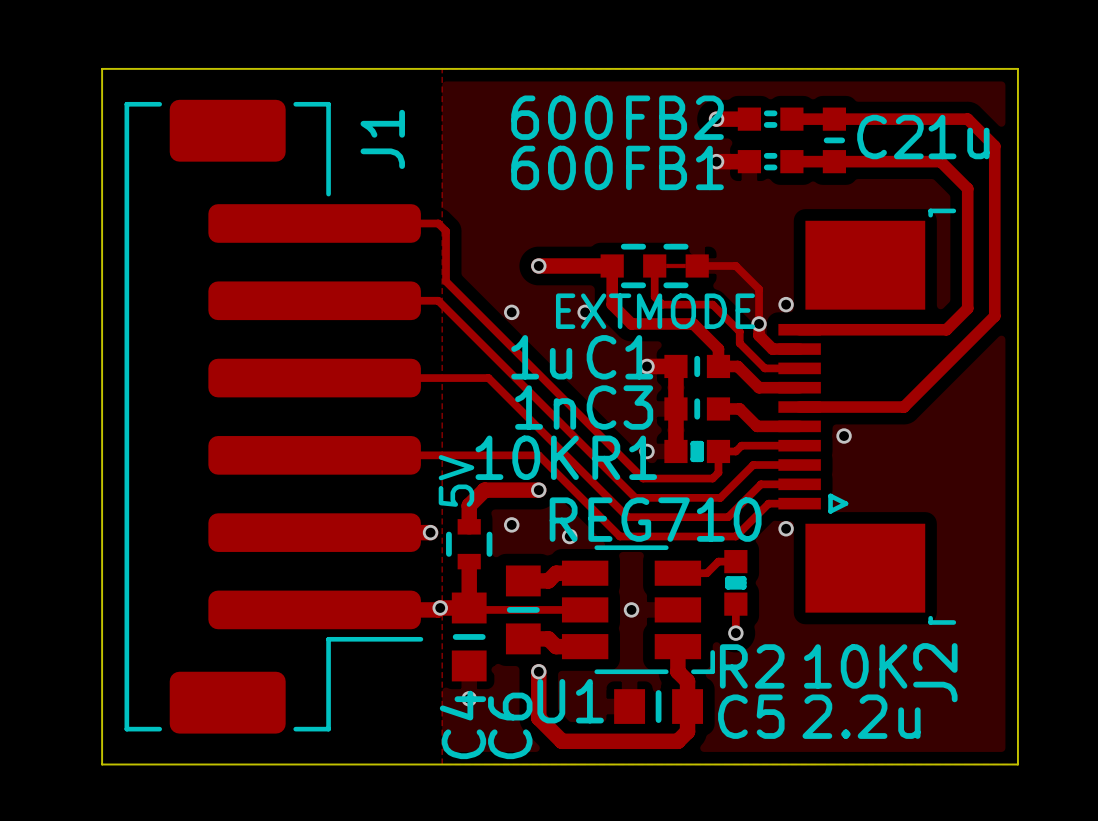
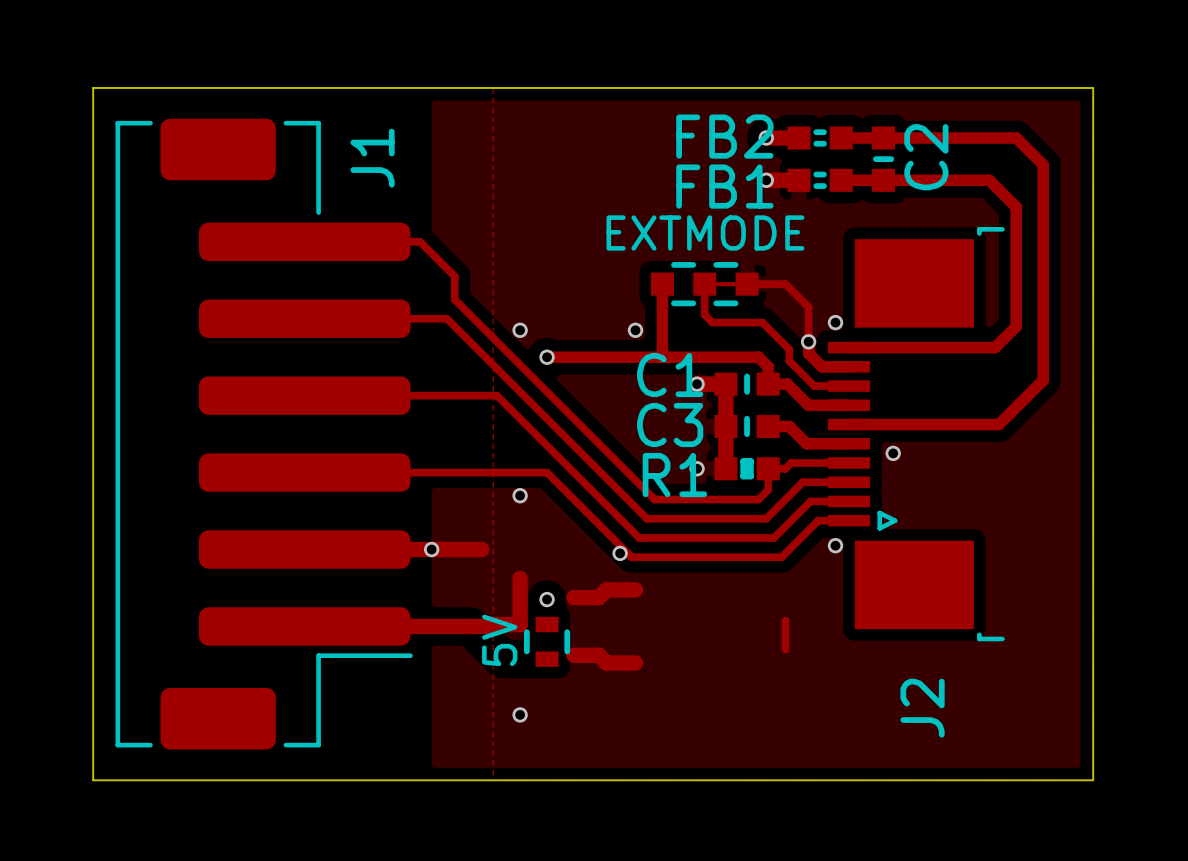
board edge: (102, 68) (102, 764) -> (154, 87) (93, 87) (93, 780) (154, 780)
board edge: (1017, 68) (1017, 764) -> (1066, 87) (1093, 87) (1093, 780) (1066, 780)
FB2 value: 600 (561, 117) -> none
C2 name rotation: 0° (890, 137) -> 90° counterclockwise (926, 157)
C2 value: 1u (959, 137) -> none
FB1 value: 600 (561, 167) -> none
track: (368, 223) (438, 223) (446, 231) (446, 281) (643, 478) (712, 478) -> (420, 241) (454, 276) (454, 299) (654, 499) (758, 499) (762, 495)
track: (538, 265) (612, 265) -> none
via: (538, 265) -> none
track: (395, 300) (438, 300) (635, 497) (720, 497) -> (447, 318) (647, 518) (766, 518) (770, 514)
track: (612, 304) (631, 323) (693, 323) (708, 339) -> (662, 322) (662, 353) (666, 357)
part value position: EXTMODE (655, 311) -> EXTMODE (705, 232)
via: none -> (520, 330)
via: (511, 312) -> none
track: (994, 316) (903, 407) -> (1043, 334) (1043, 380) (998, 424) (952, 424)
track: none -> (547, 357) (758, 357)
via: none -> (547, 357)
C1 value: 1u (541, 357) -> none
track: (446, 378) (488, 378) (627, 517) (728, 517) -> (497, 395) (639, 537) (773, 537) (777, 534)
C3 value: 1n (545, 407) -> none
J1 position: (273, 416) -> (264, 434)
track: (496, 455) (538, 455) (619, 536) (735, 536) -> (547, 472) (631, 557) (781, 557) (785, 553)
R1 value: 10K (527, 457) -> none
via: none -> (520, 495)
part value position: 5V (456, 480) -> 5V (499, 640)
track: (538, 490) (484, 490) (469, 505) (469, 526) -> none
via: (538, 490) -> none
via: (511, 524) -> none
via: none -> (431, 549)
via: (430, 532) -> none
part position: (469, 544) -> (547, 641)
track: (735, 561) (718, 561) (706, 573) (677, 573) -> none
via: none -> (547, 599)
R2: 10K (735, 582) -> none
via: (440, 607) -> none
track: (471, 609) (585, 609) -> none
C6: (523, 609) -> none
via: (631, 609) -> none
U1: REG710 (638, 609) -> none
via: (735, 633) -> none
C4: (469, 636) -> none
track: (677, 646) (677, 671) (687, 681) (687, 731) (677, 741) (561, 741) (538, 718) (538, 671) -> none
via: (538, 671) -> none
J2 name position: J2 (935, 672) -> J2 (922, 708)
C5: 2.2u (658, 706) -> none

